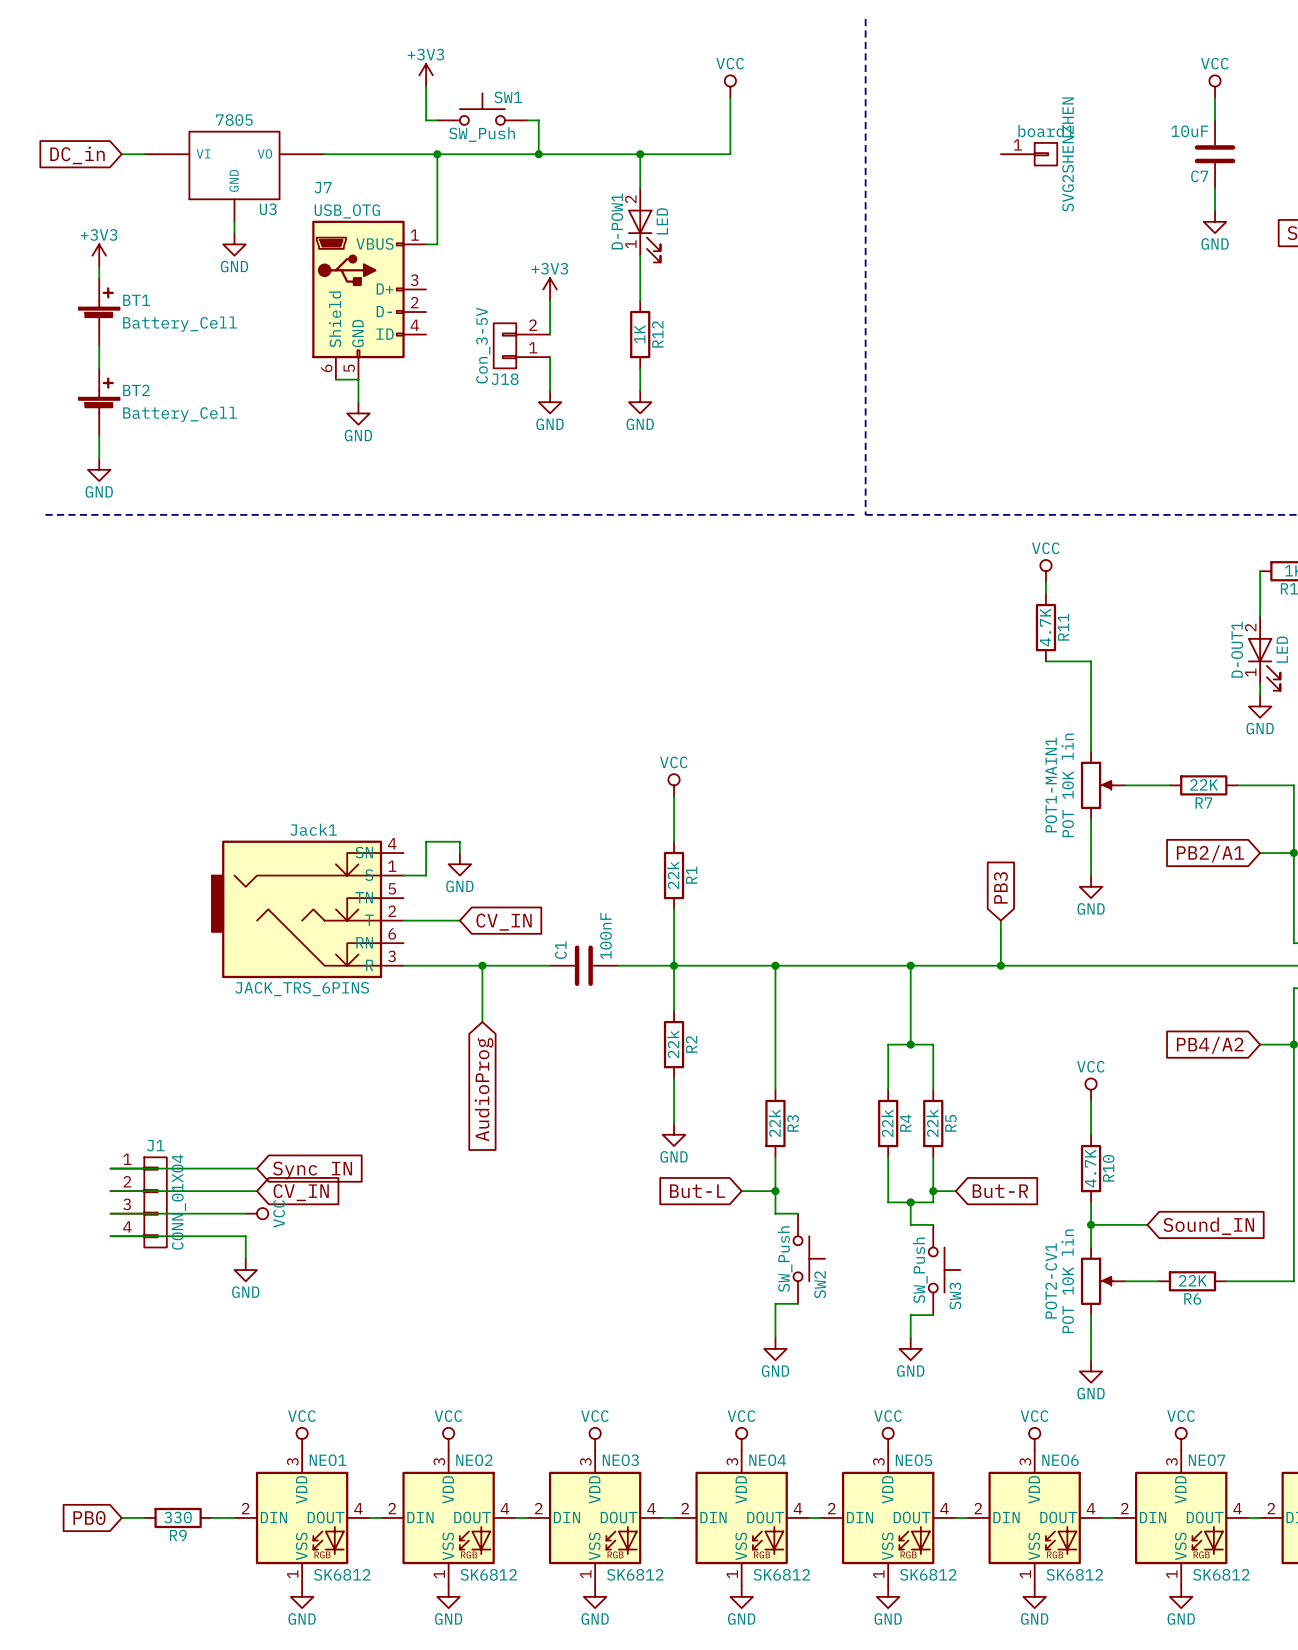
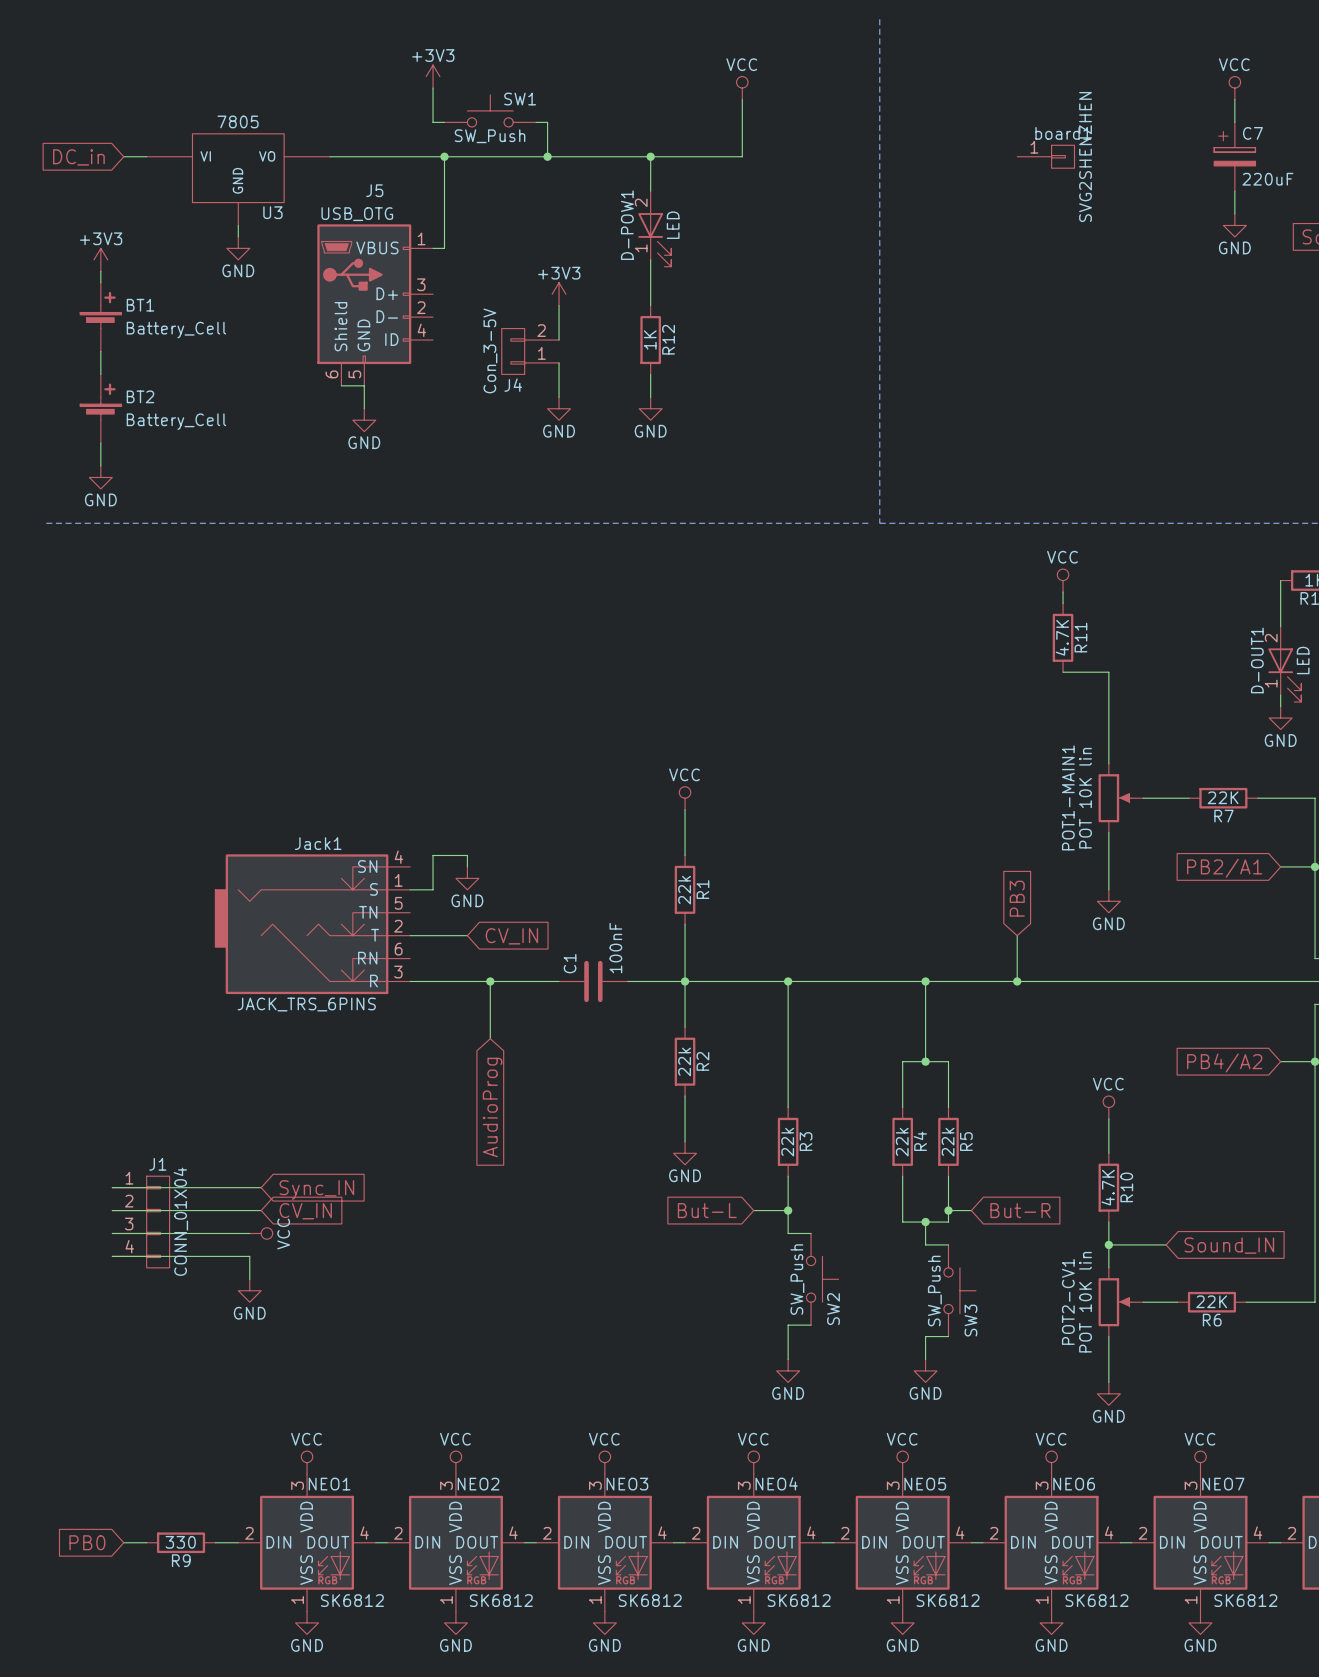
C7 symbol: [1194, 120, 1236, 189] -> [1214, 122, 1256, 192]
C7 value: 10uF (1189, 131) -> 220uF (1267, 179)
C7 name position: C7 (1199, 176) -> C7 (1252, 133)
J7 name: J7 (323, 187) -> J5 (374, 190)
J18 name: J18 (505, 379) -> J4 (513, 385)

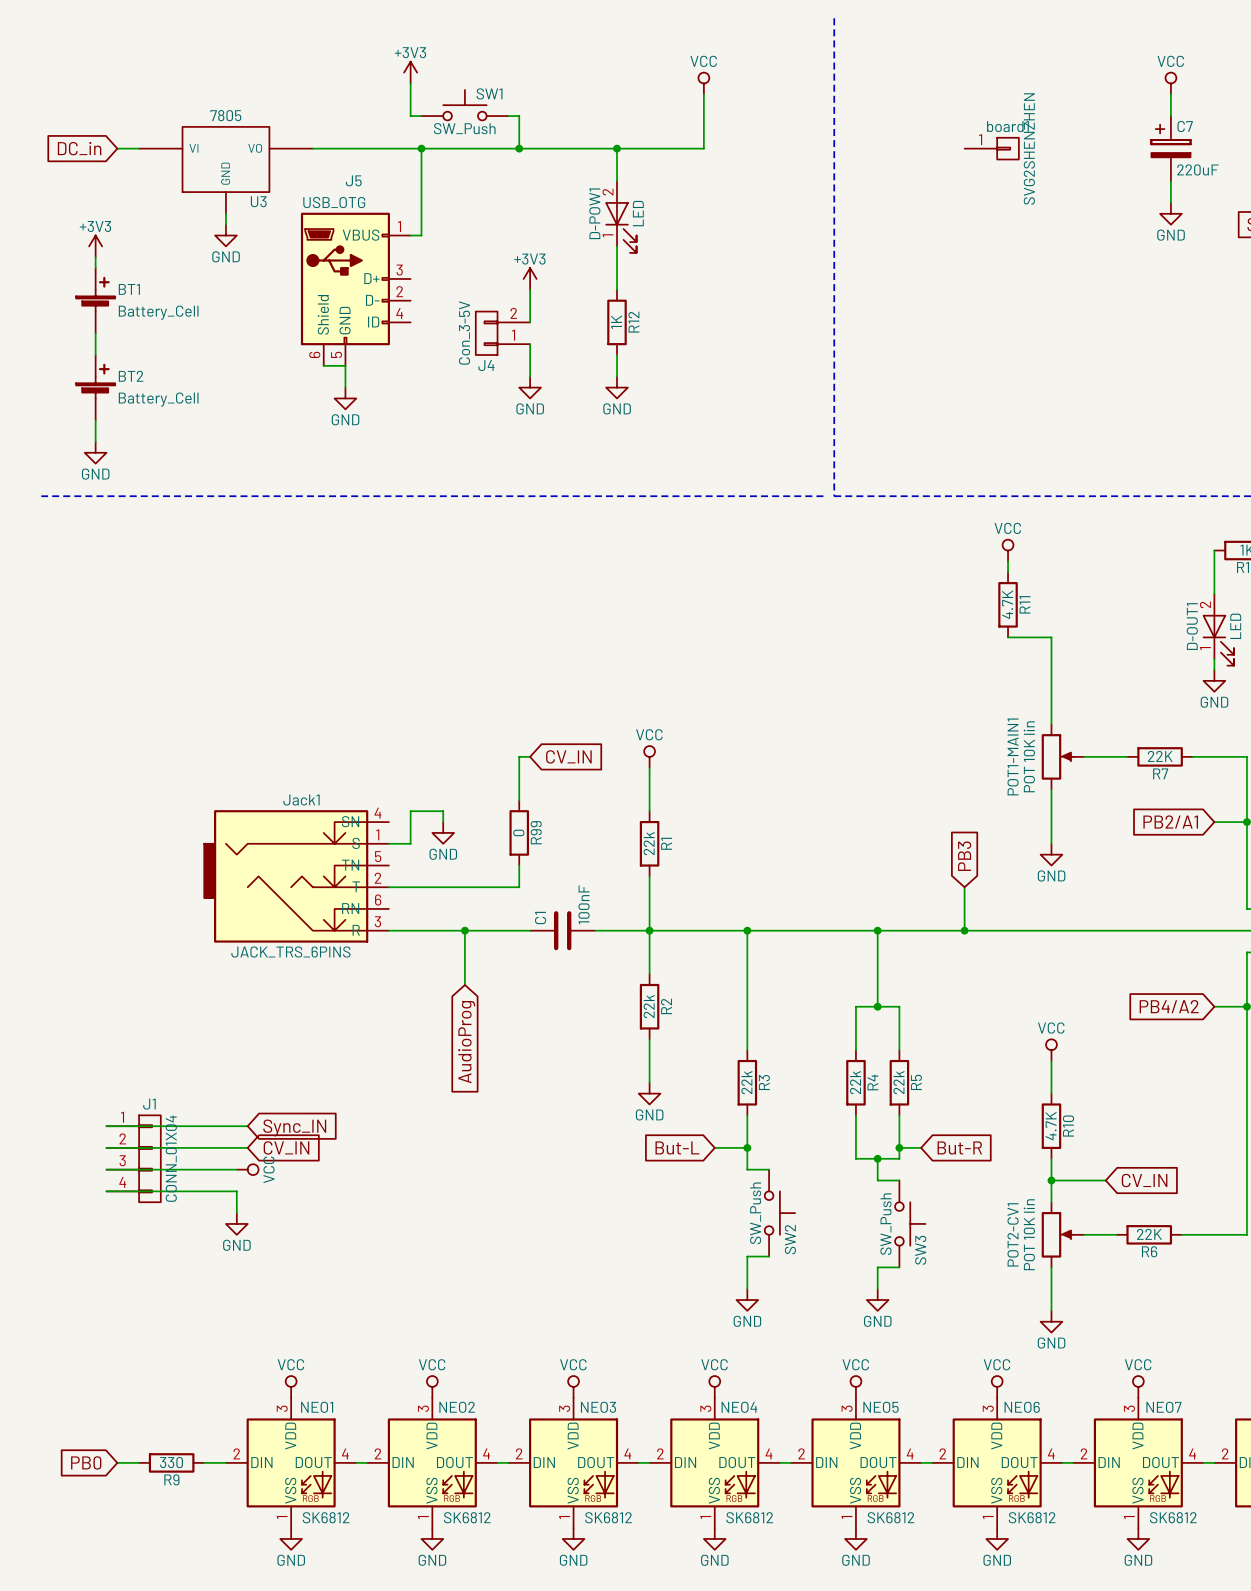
wire: none -> (530, 756) (519, 756) (519, 800)
R99: none -> 0 (519, 832)
wire: none -> (519, 865) (519, 887) (443, 887)
global label position: CV_IN (511, 936) -> CV_IN (568, 756)
global label: Sound_IN (1229, 1245) -> CV_IN (1144, 1180)

